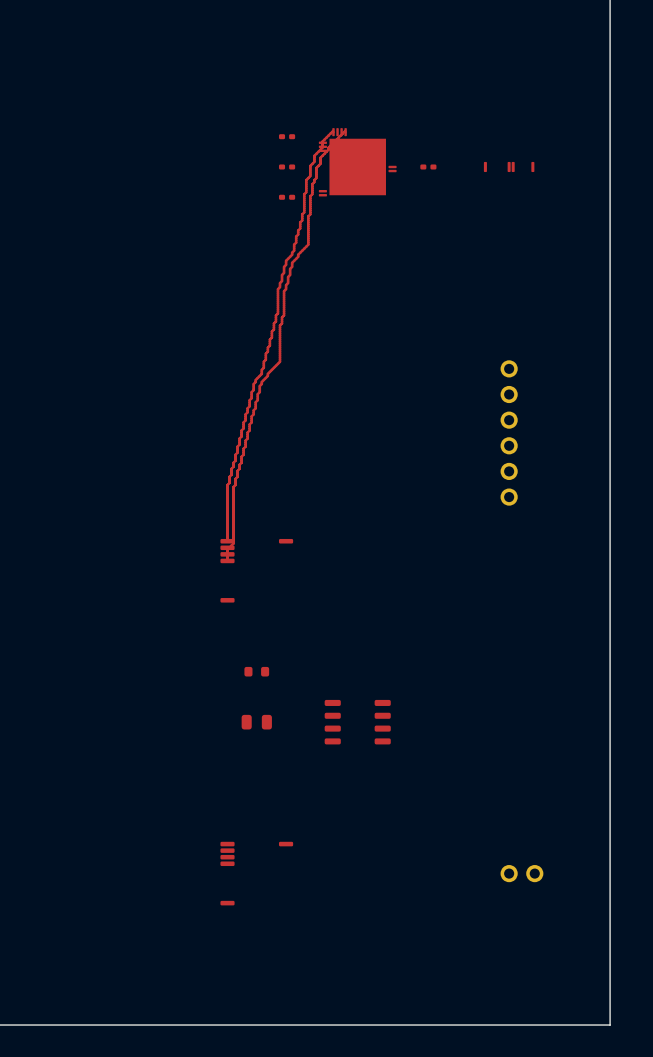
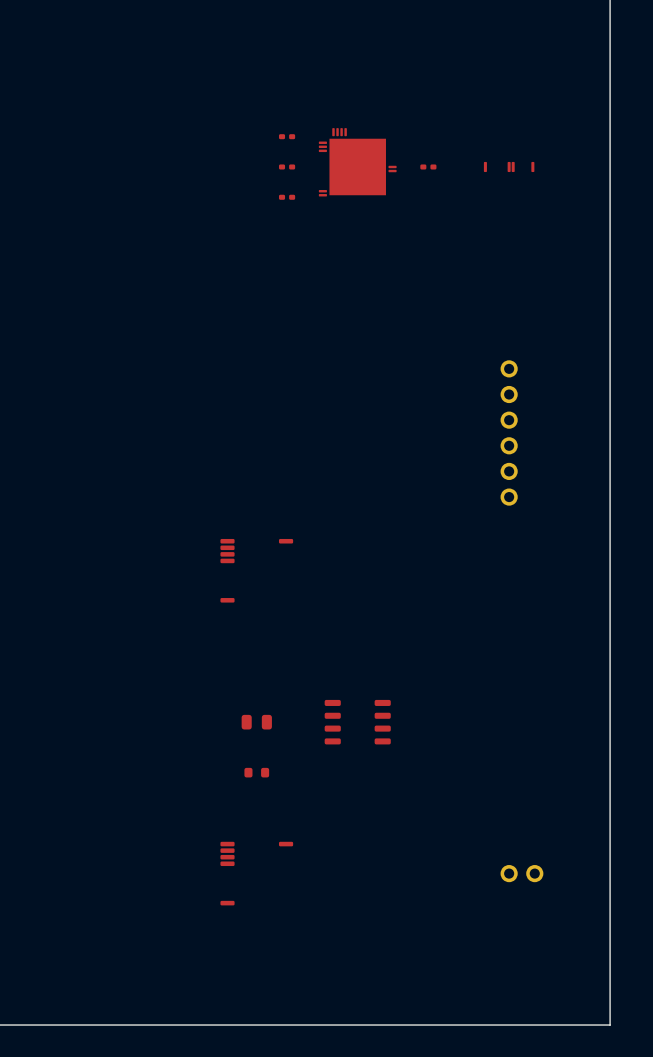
top track: (333, 132) (322, 141) (322, 147) (314, 155) (314, 161) (310, 165) (310, 176) (306, 180) (304, 212) (300, 228) (296, 236) (294, 250) (286, 260) (282, 281) (277, 289) (277, 313) (269, 345) (265, 353) (261, 373) (253, 384) (235, 460) (227, 484) (227, 541) -> none
top track: (345, 132) (328, 147) (320, 157) (320, 163) (316, 167) (316, 178) (312, 184) (312, 194) (310, 196) (308, 244) (292, 262) (288, 283) (284, 291) (284, 315) (280, 325) (280, 361) (267, 373) (259, 386) (241, 462) (233, 486) (233, 543) (227, 549) (227, 561) -> none
part position: (256, 671) -> (256, 772)

